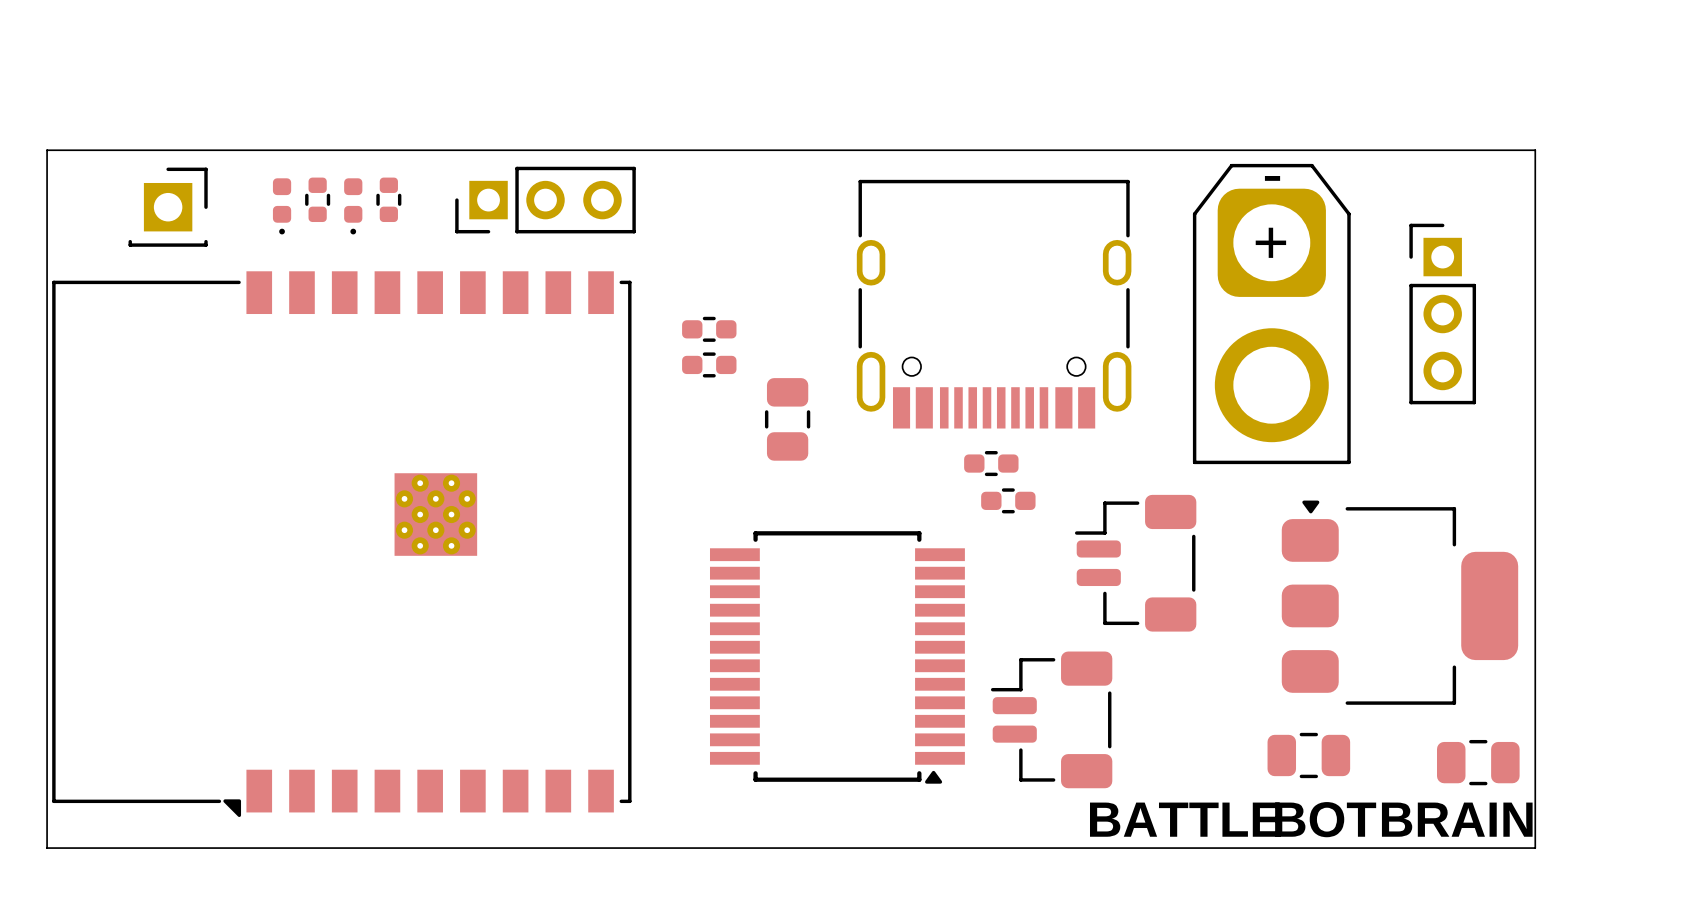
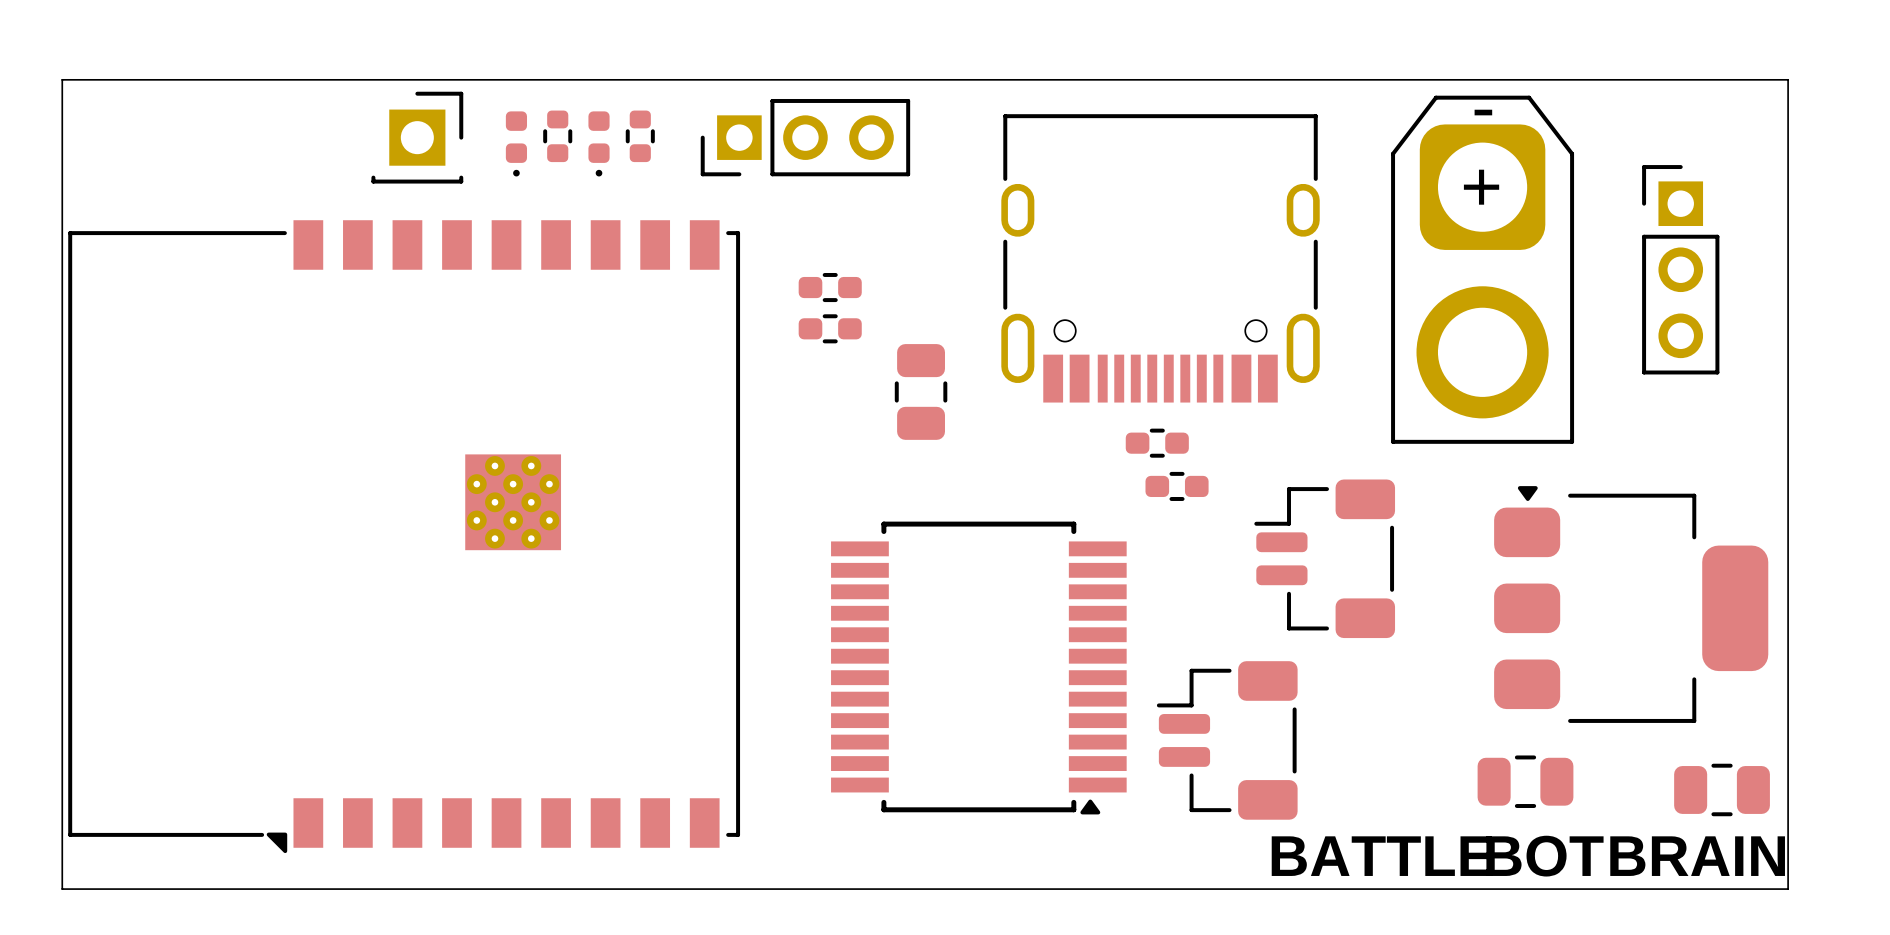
part footprint: [455, 166, 636, 234] -> [625, 110, 655, 163]
part footprint: [344, 178, 363, 235] -> [371, 91, 464, 184]
part: none -> (557, 136)
part: (317, 199) -> none
part: (388, 199) -> none
part: none -> (805, 137)
part: none -> (516, 143)
part: none -> (599, 143)
part: (282, 206) -> none
part: (168, 207) -> none

